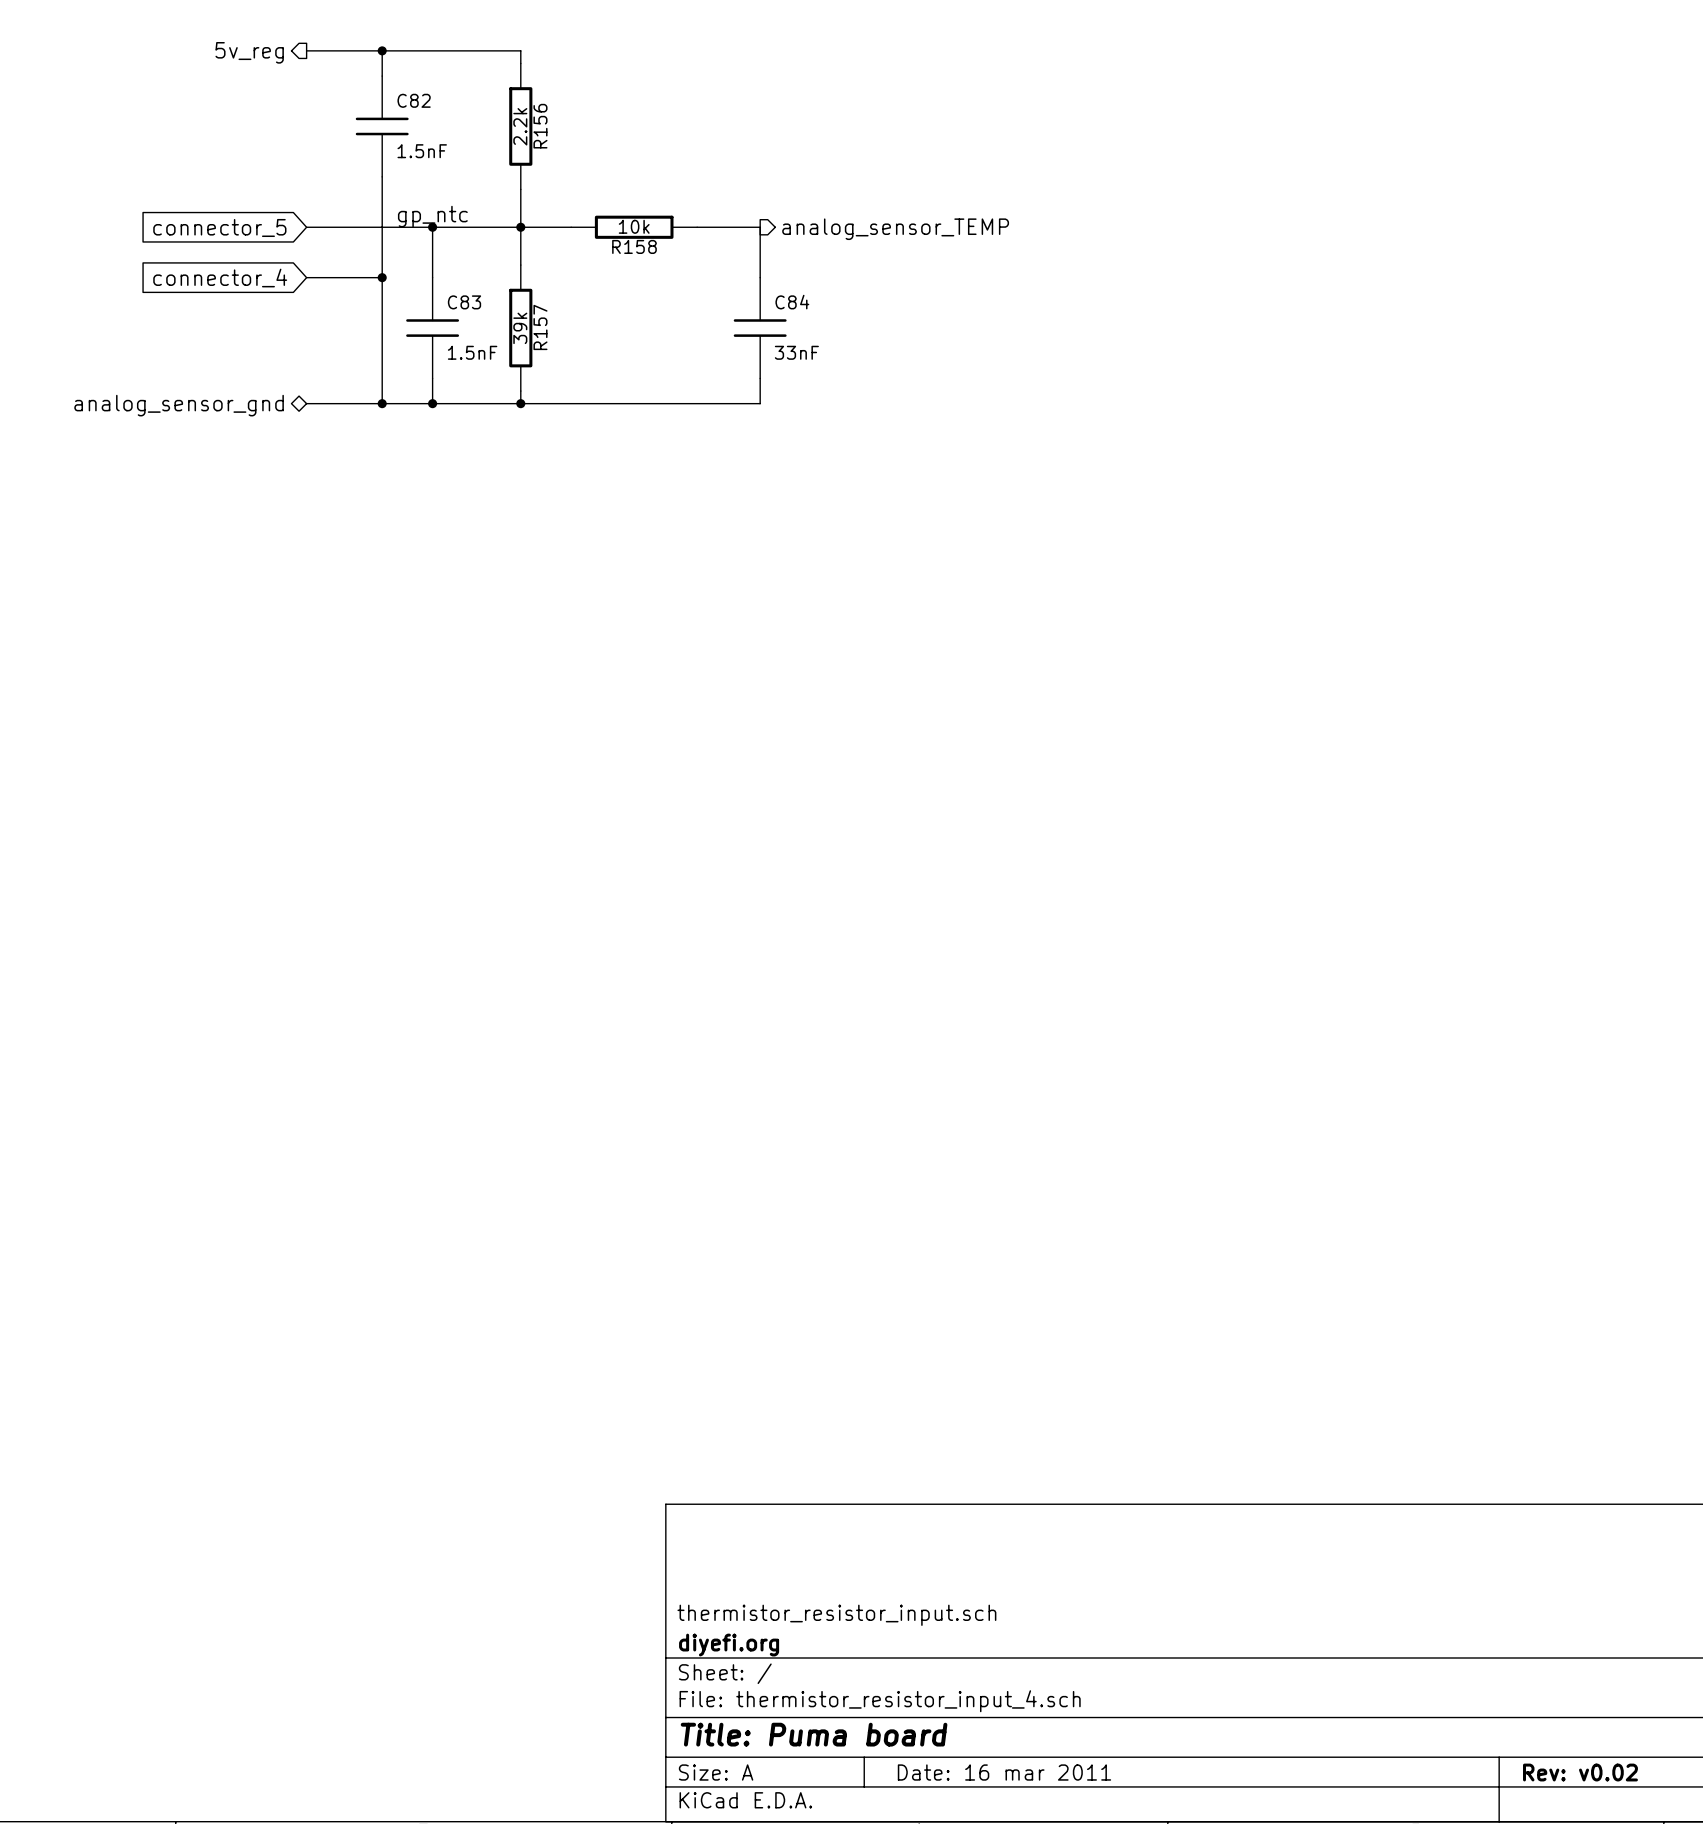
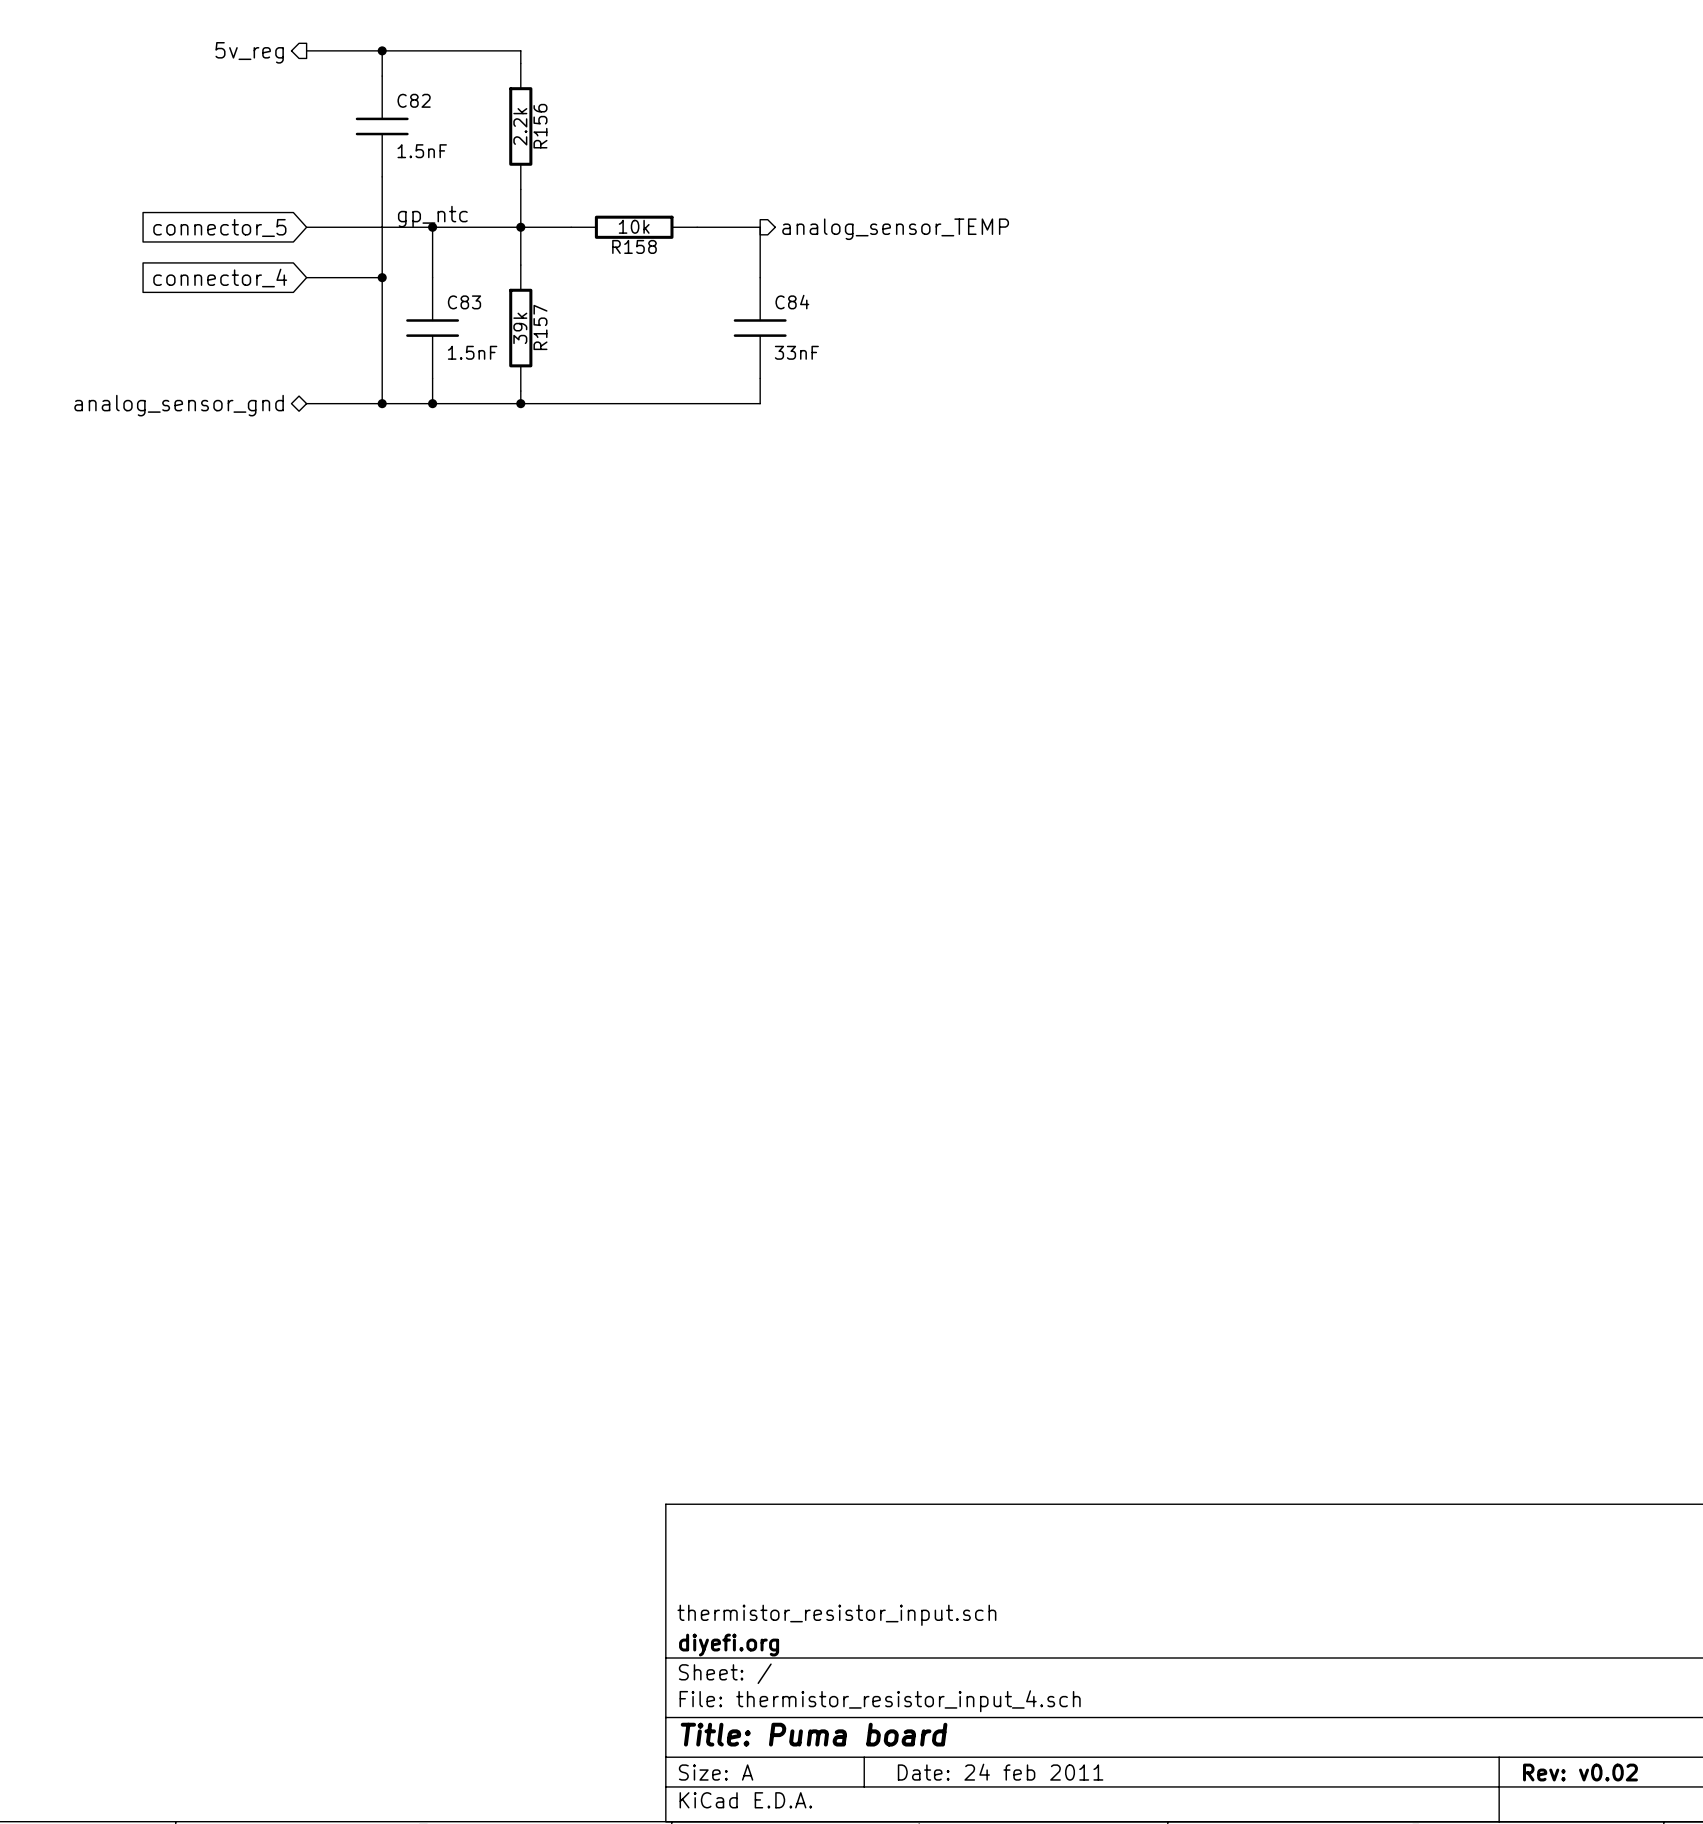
title block: Date: 16 mar 2011 (1004, 1772) -> Date: 24 feb 2011 (1000, 1772)

